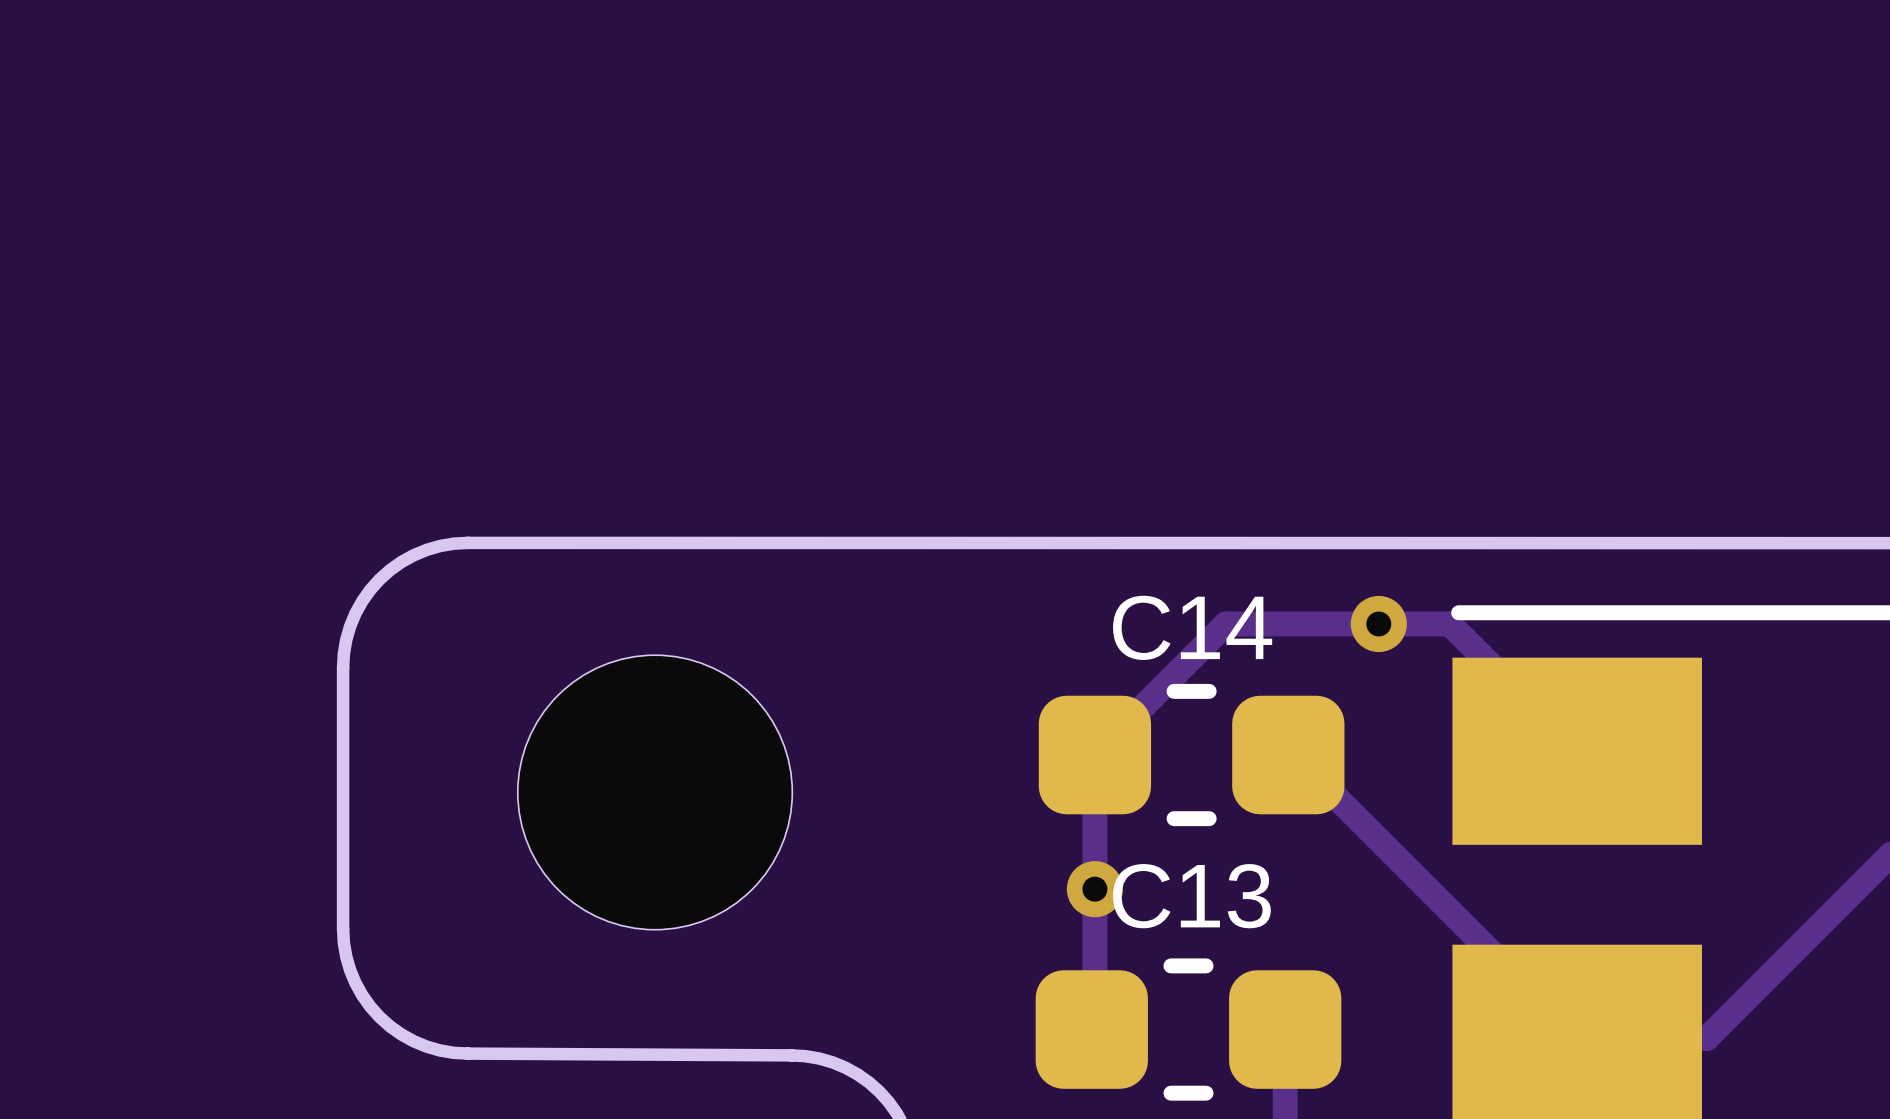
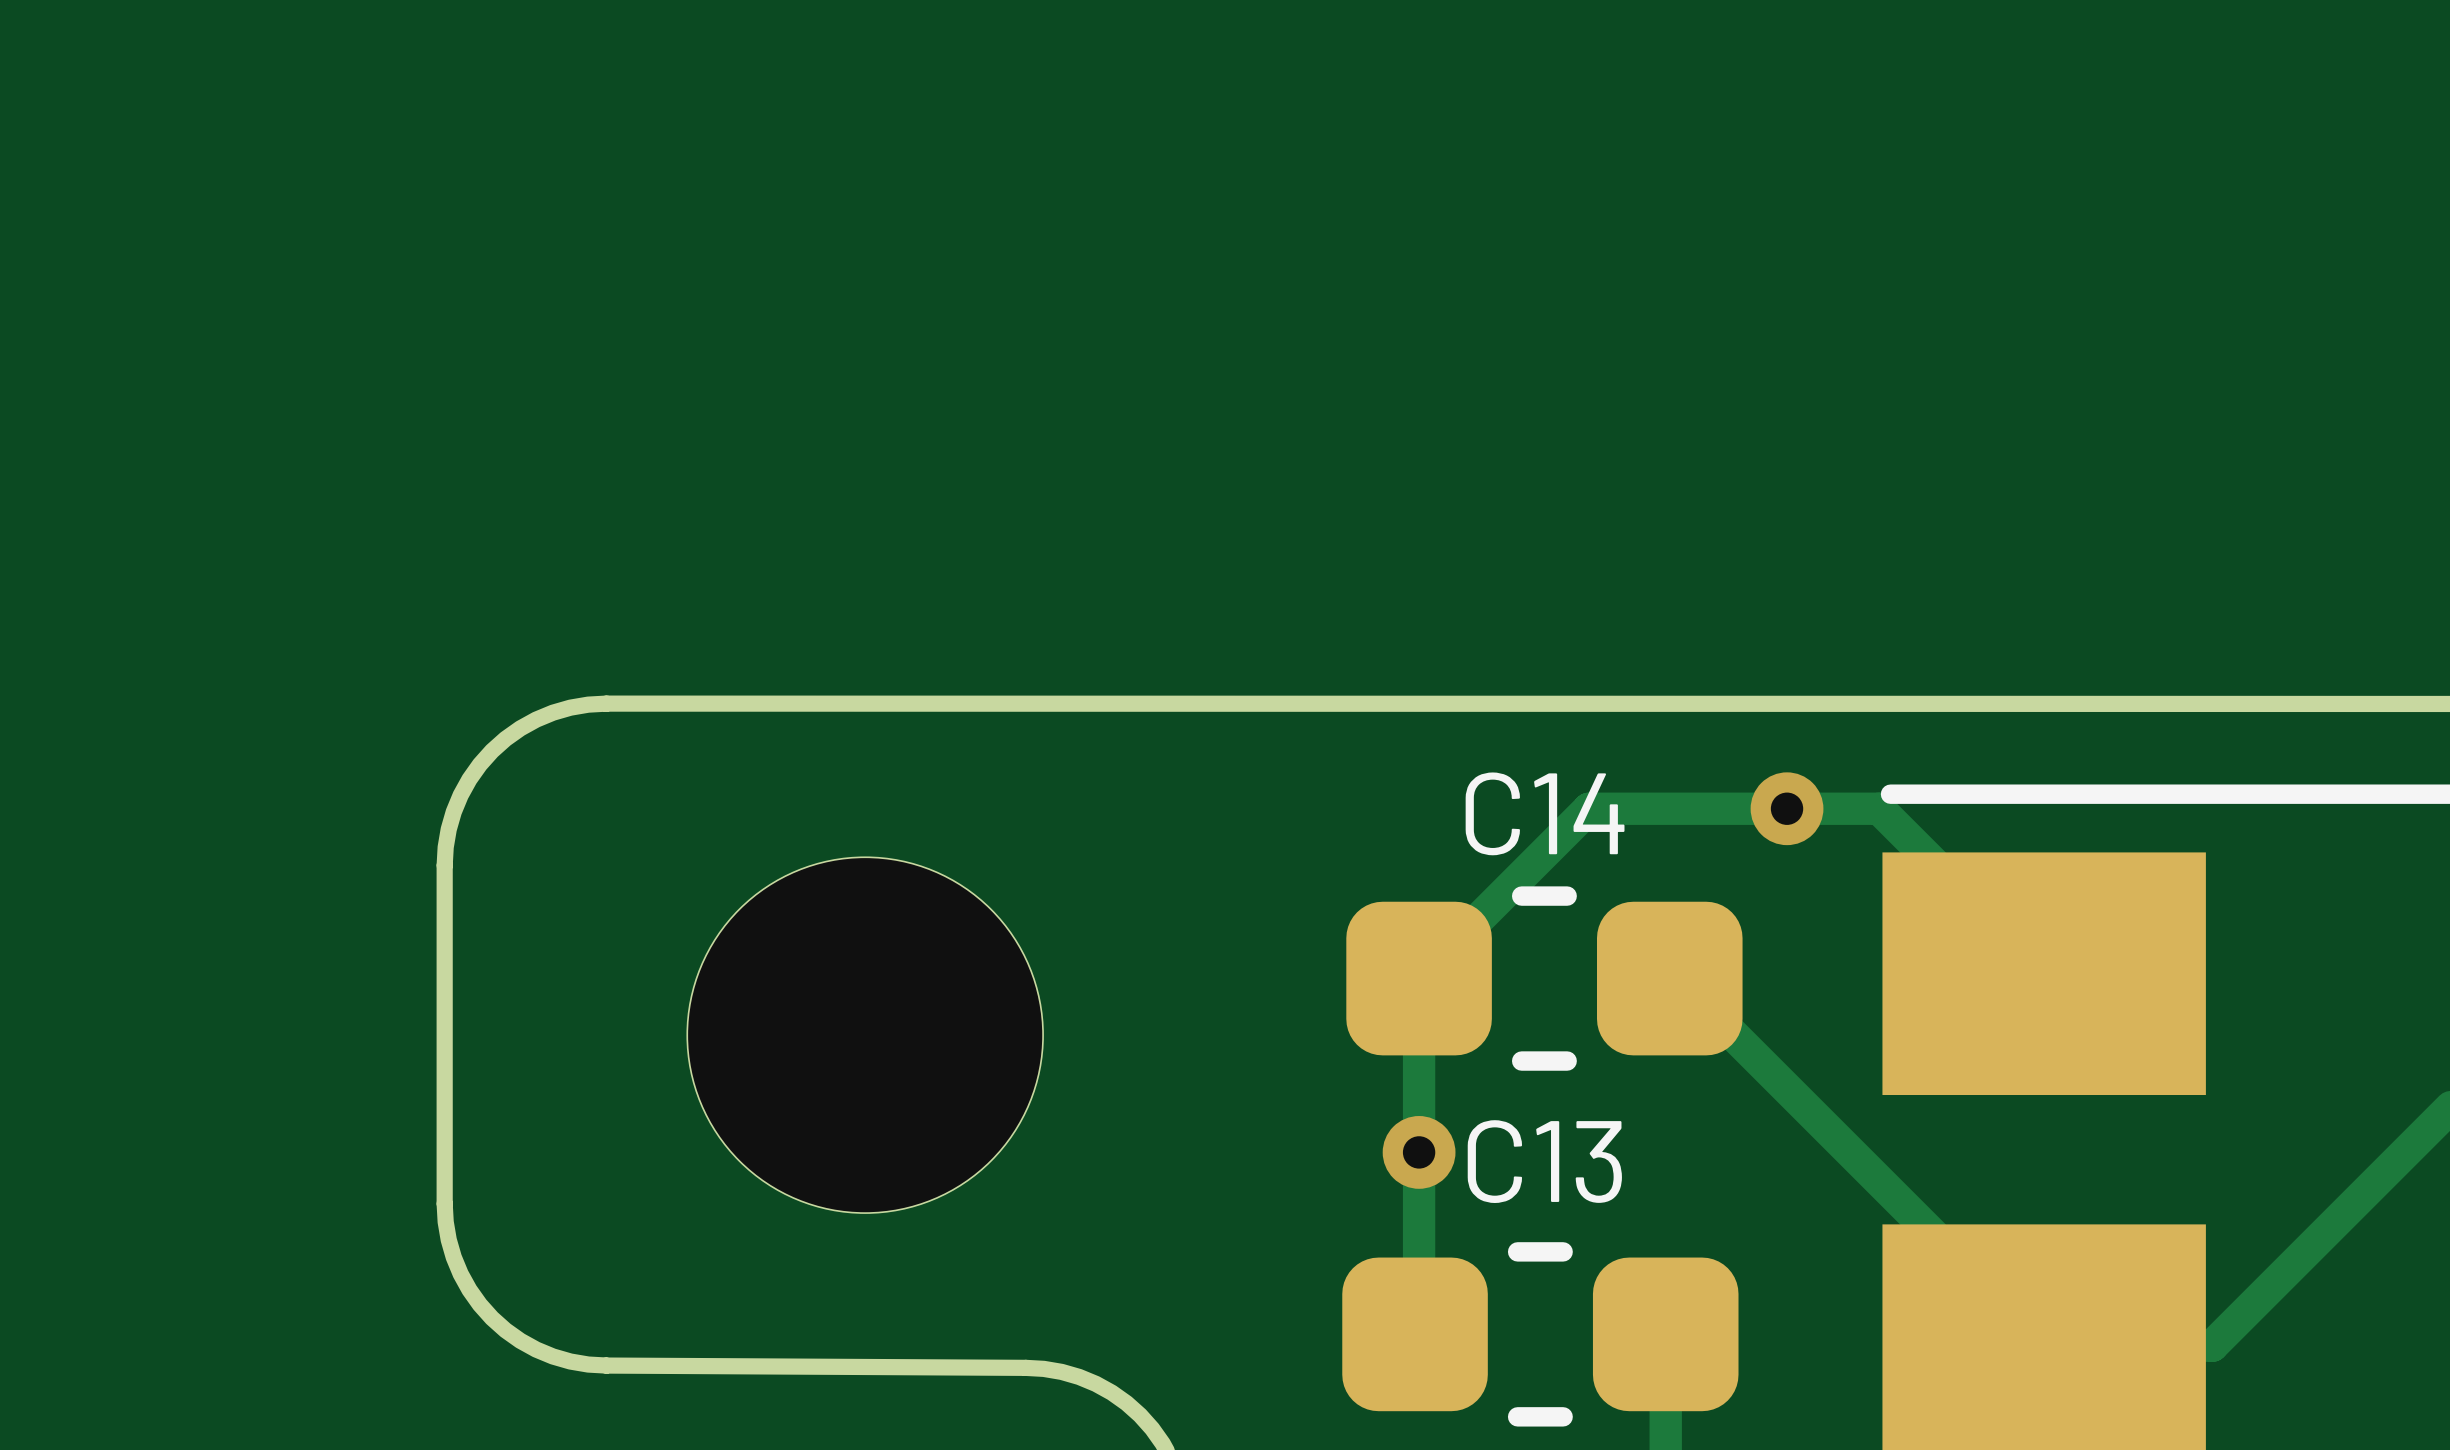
part position: (655, 792) -> (865, 1035)

